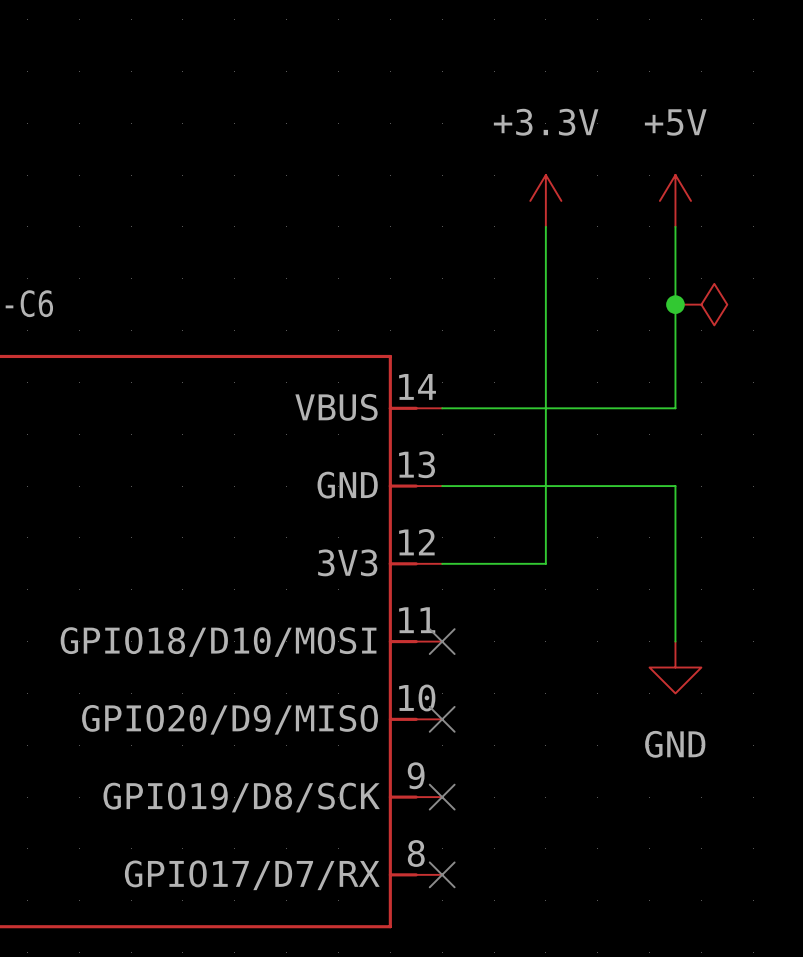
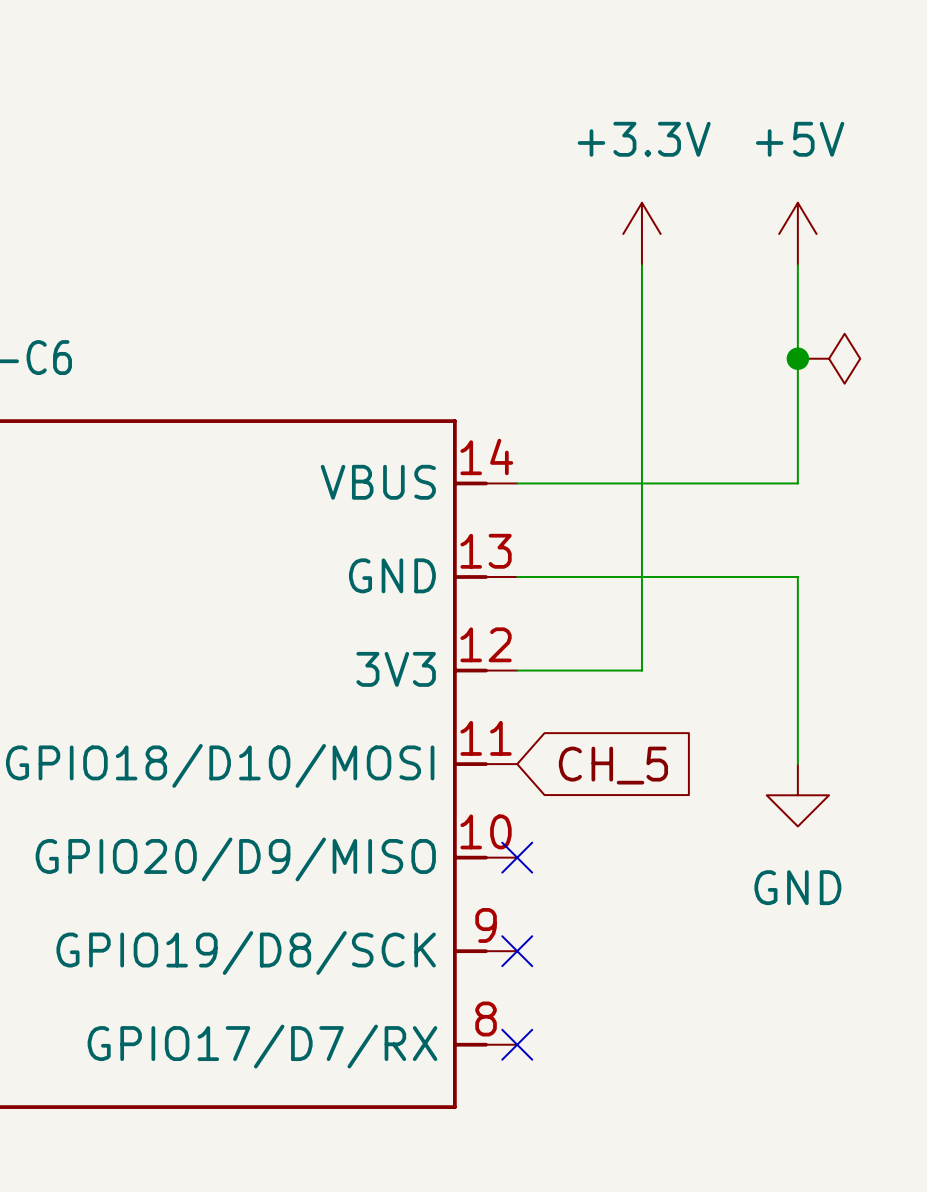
no-connect mark: (442, 641) -> none
global label: none -> CH_5 (613, 765)

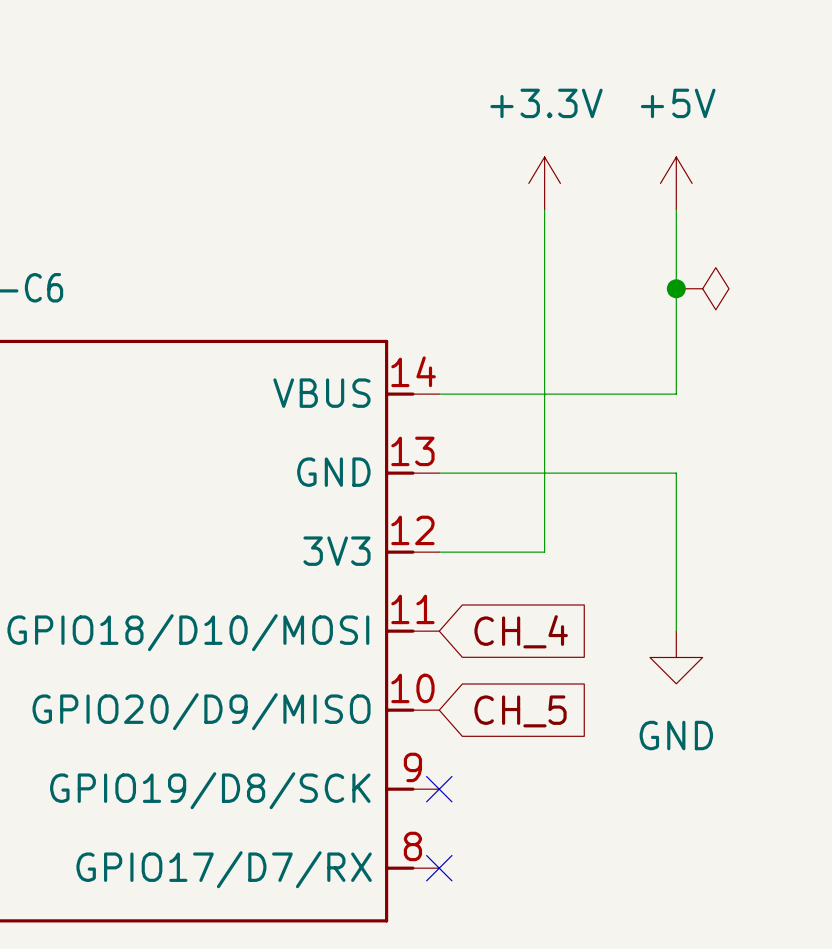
global label: CH_5 (613, 765) -> CH_4 (521, 631)
no-connect mark: (517, 857) -> none
global label: none -> CH_5 (520, 711)

